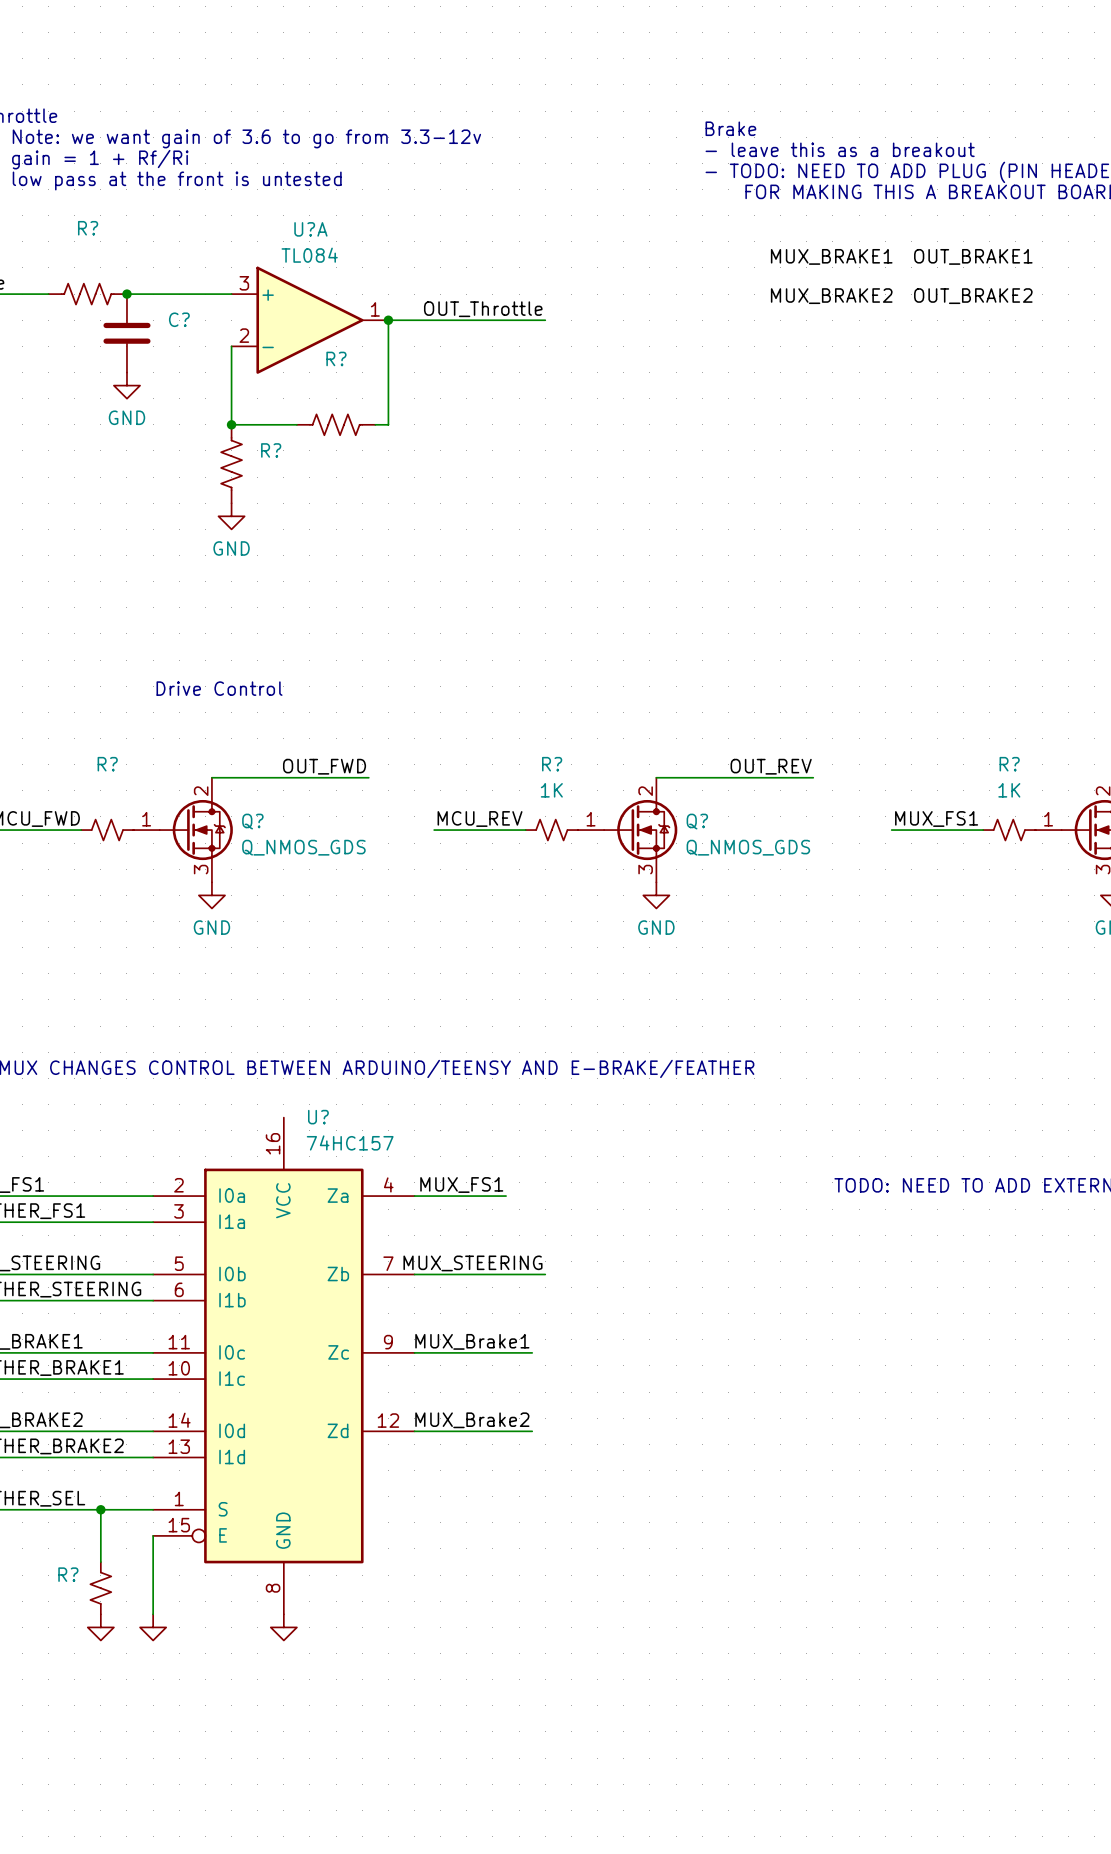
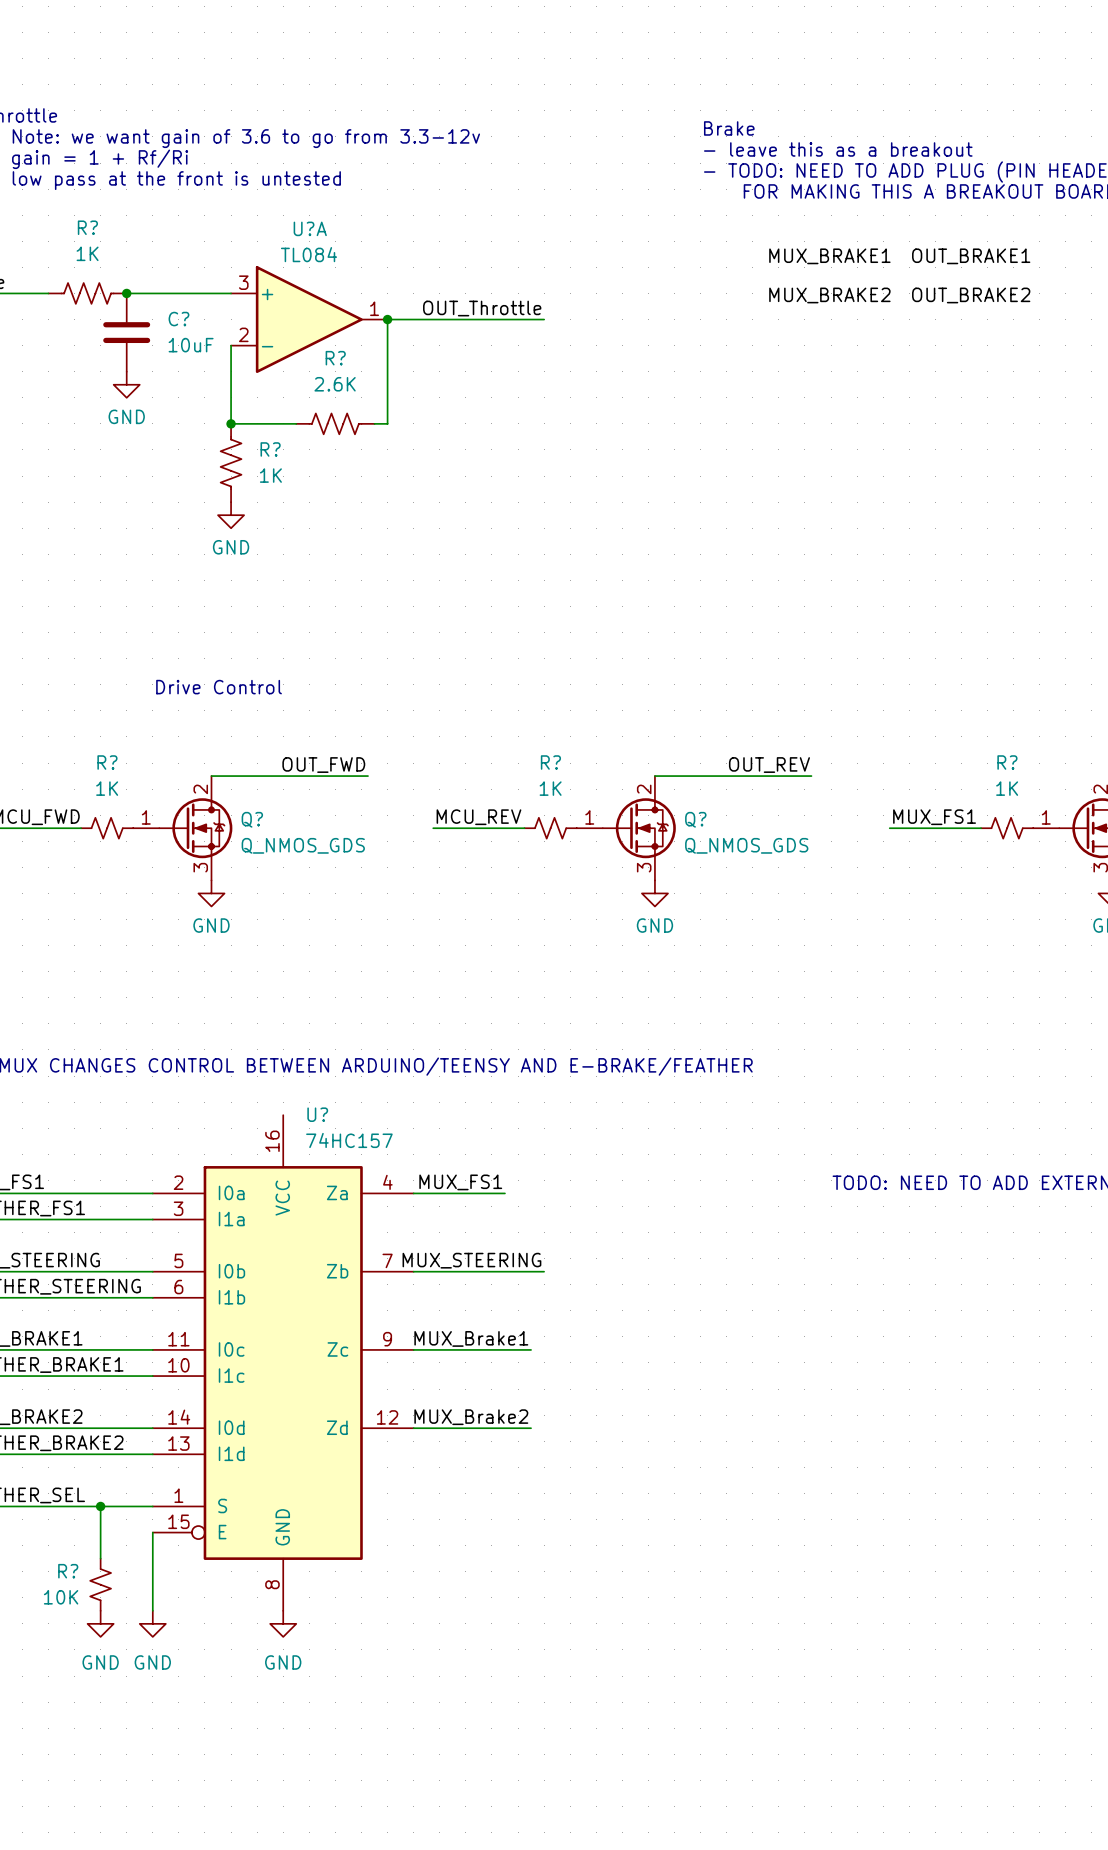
R? value: none -> 1K (87, 253)
C? value: none -> 10uF (191, 345)
R? value: none -> 2.6K (335, 384)
R? value: none -> 1K (270, 475)
R? value: none -> 1K (107, 788)
R? value: none -> 10K (61, 1597)
power symbol text: none -> GND (100, 1662)
power symbol text: none -> GND (152, 1662)
power symbol text: none -> GND (283, 1662)

